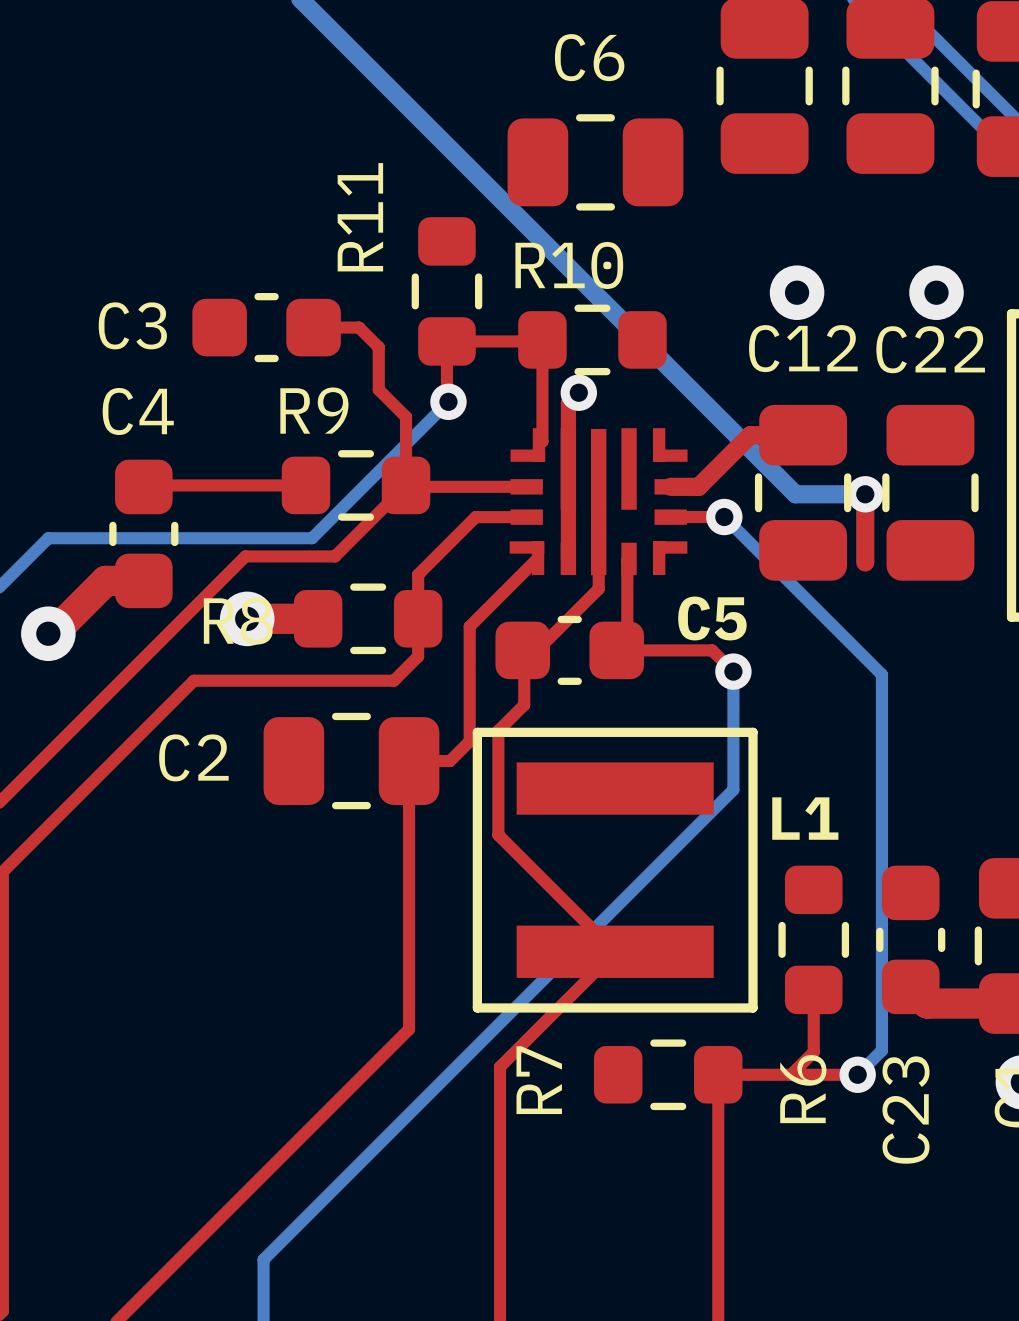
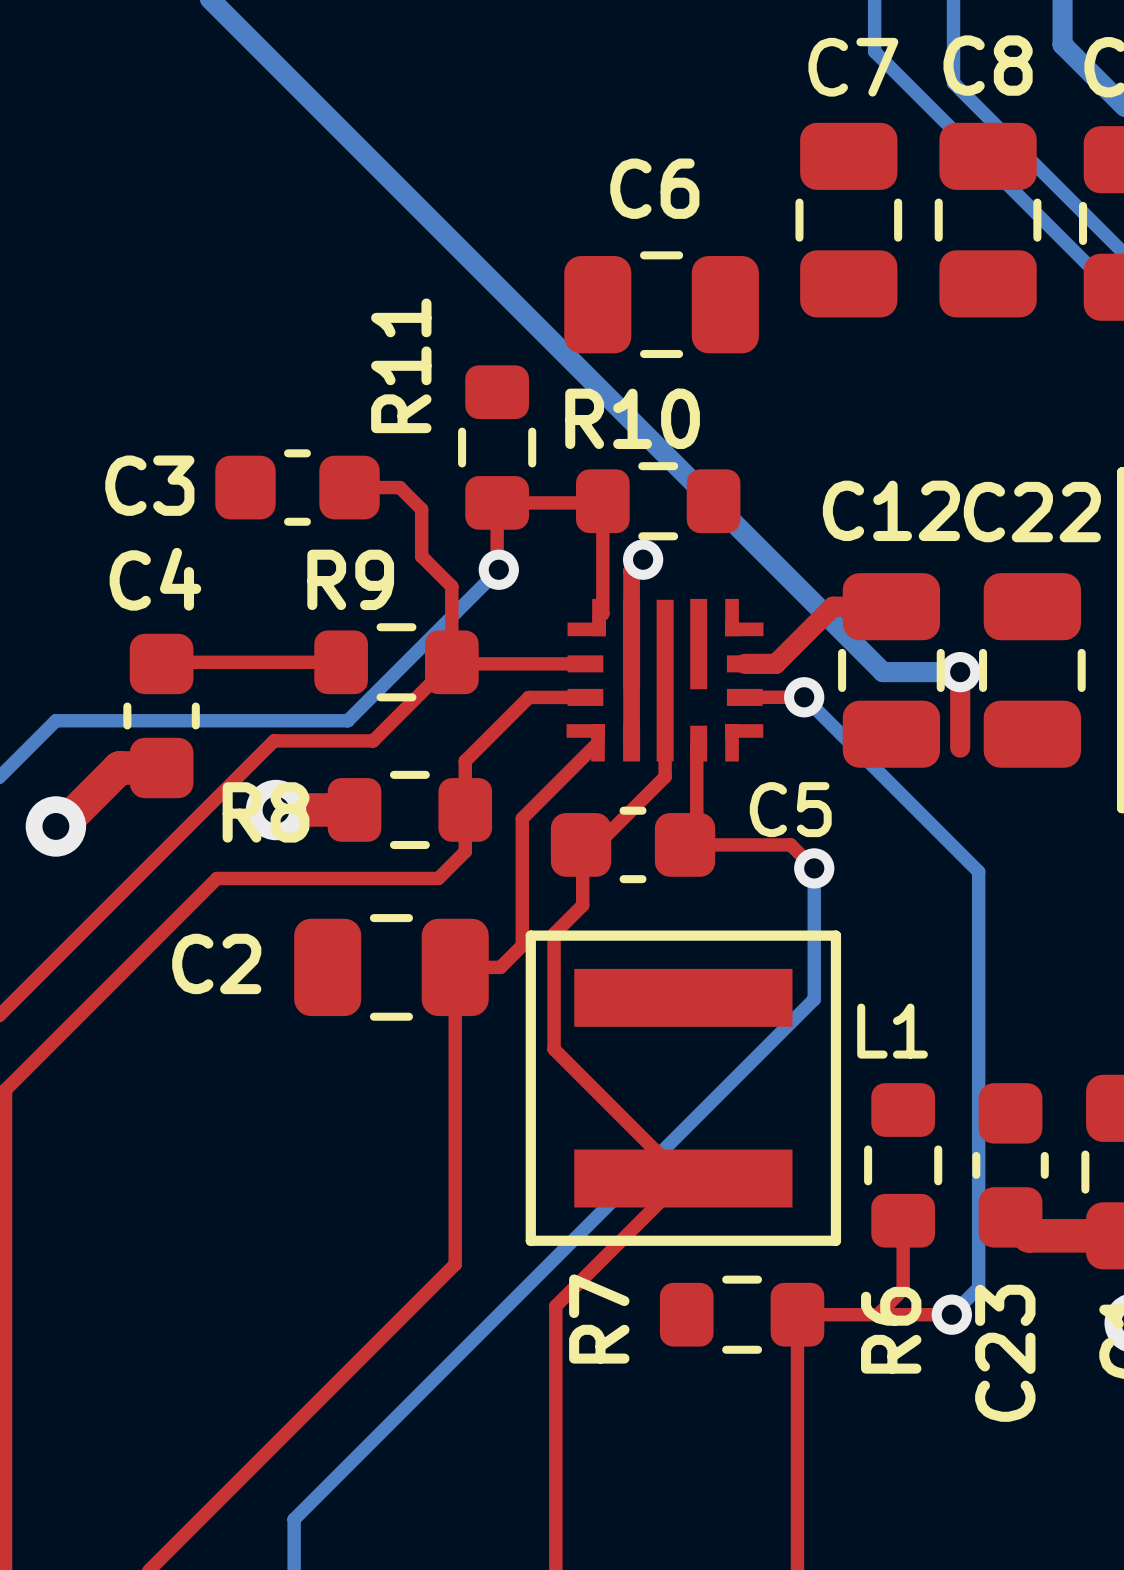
via: (797, 292) -> none
via: (936, 292) -> none

